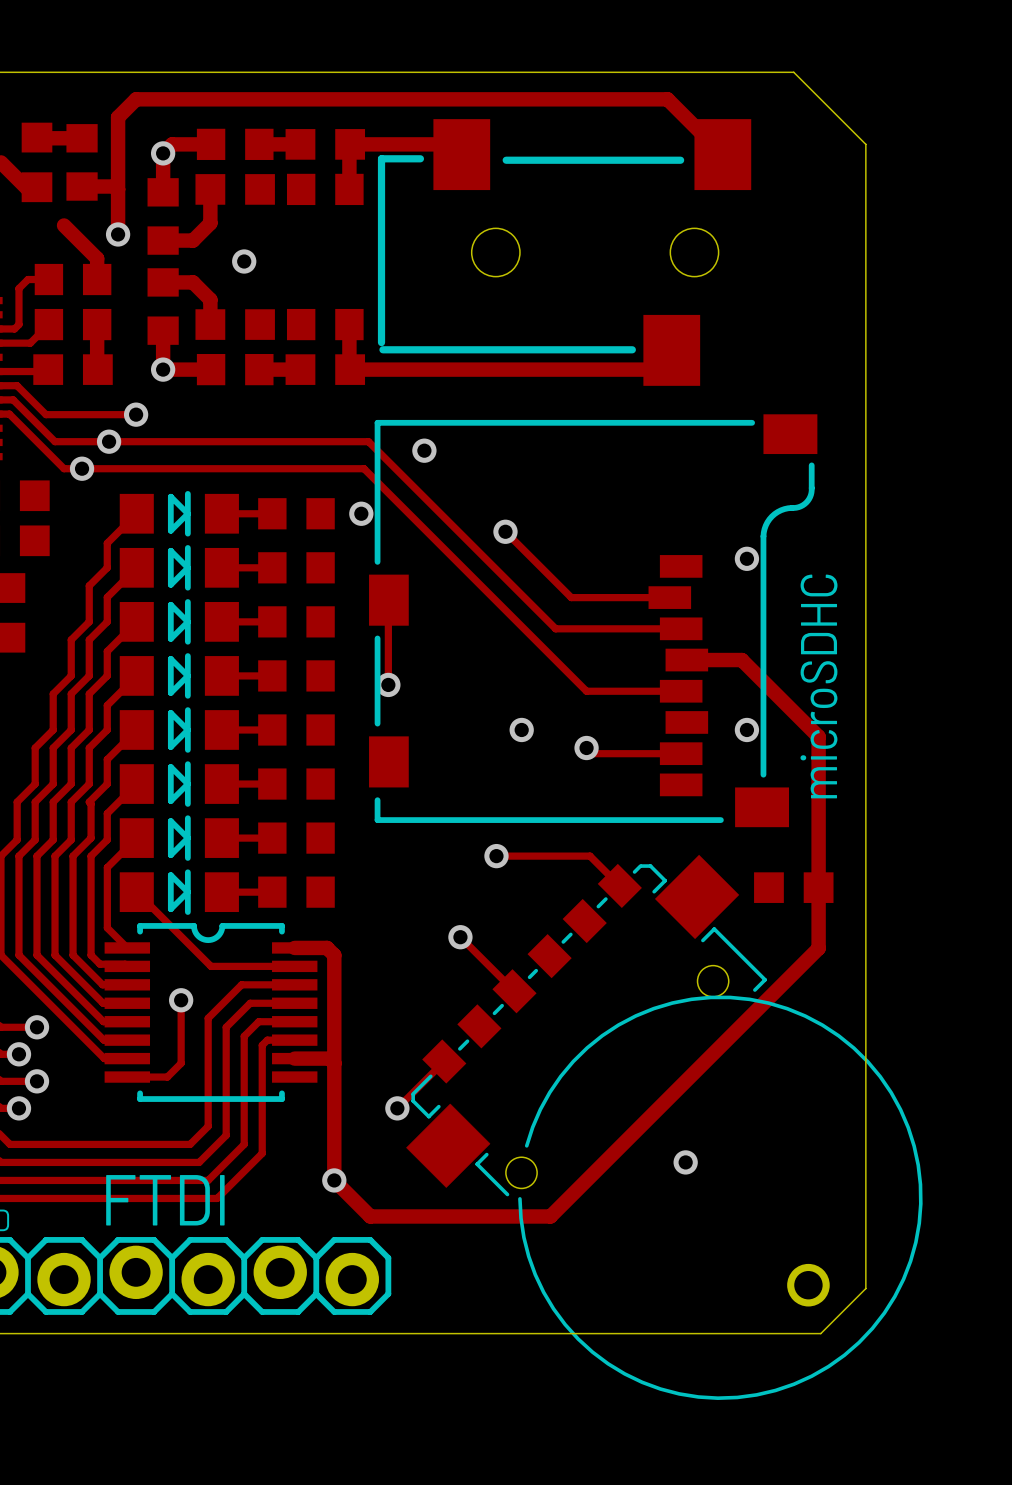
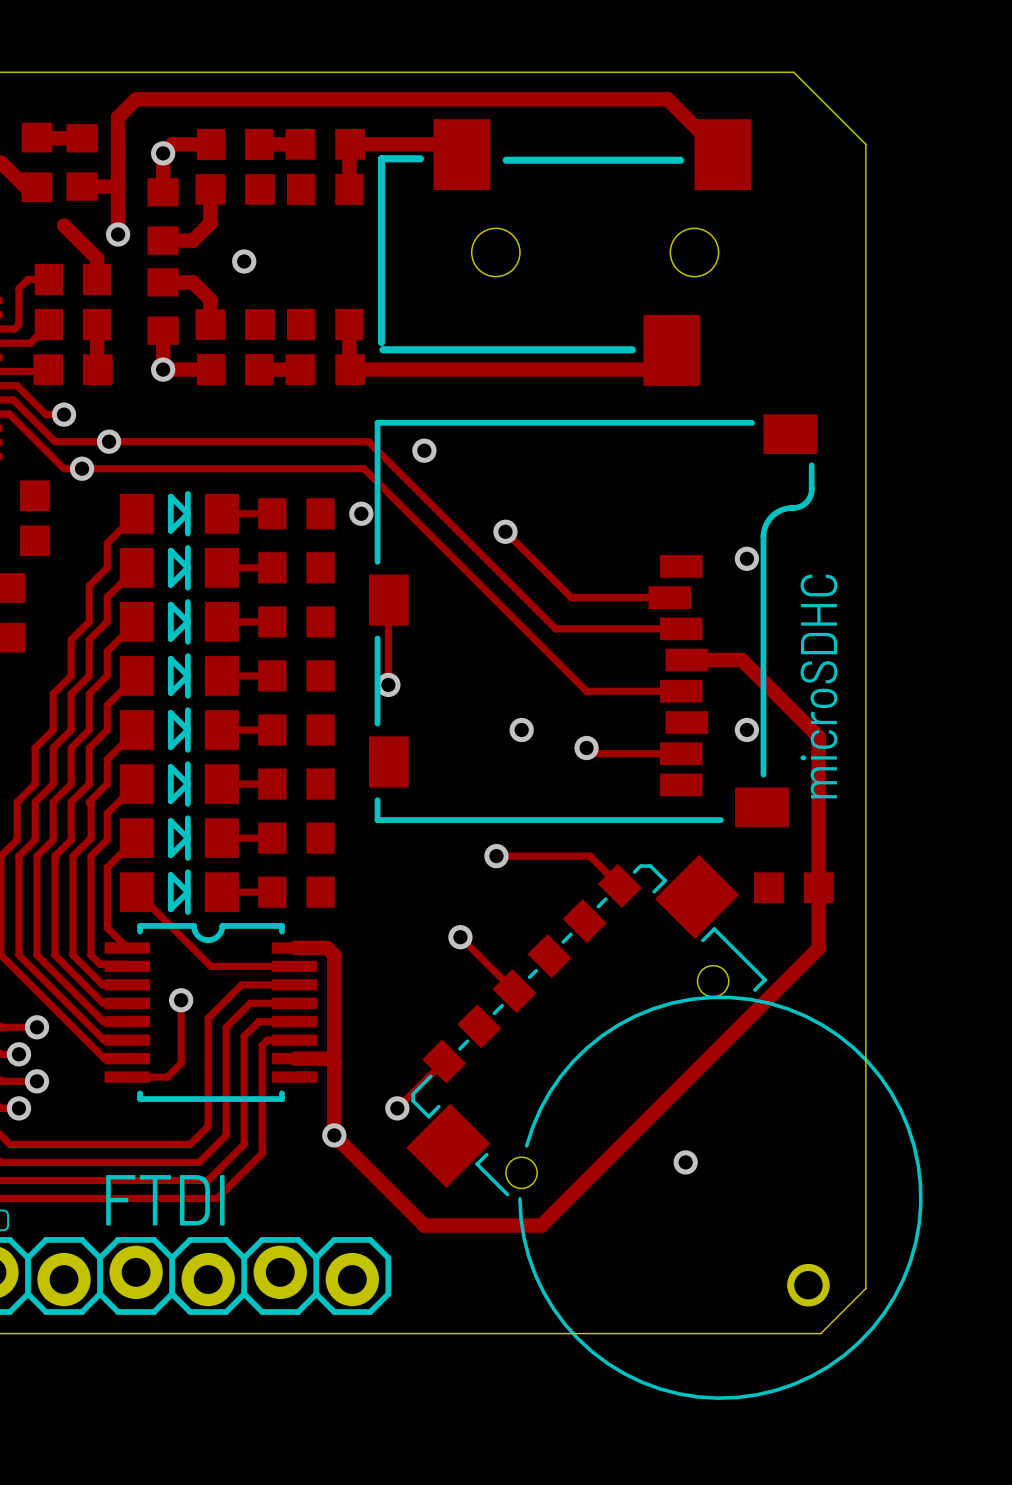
track: (64, 414) (136, 414) -> none
via position: (136, 414) -> (64, 414)
track: (334, 1135) (334, 1180) (370, 1216) (550, 1216) -> (334, 1135) (424, 1225) (541, 1225) (550, 1216)
via position: (334, 1180) -> (334, 1135)

